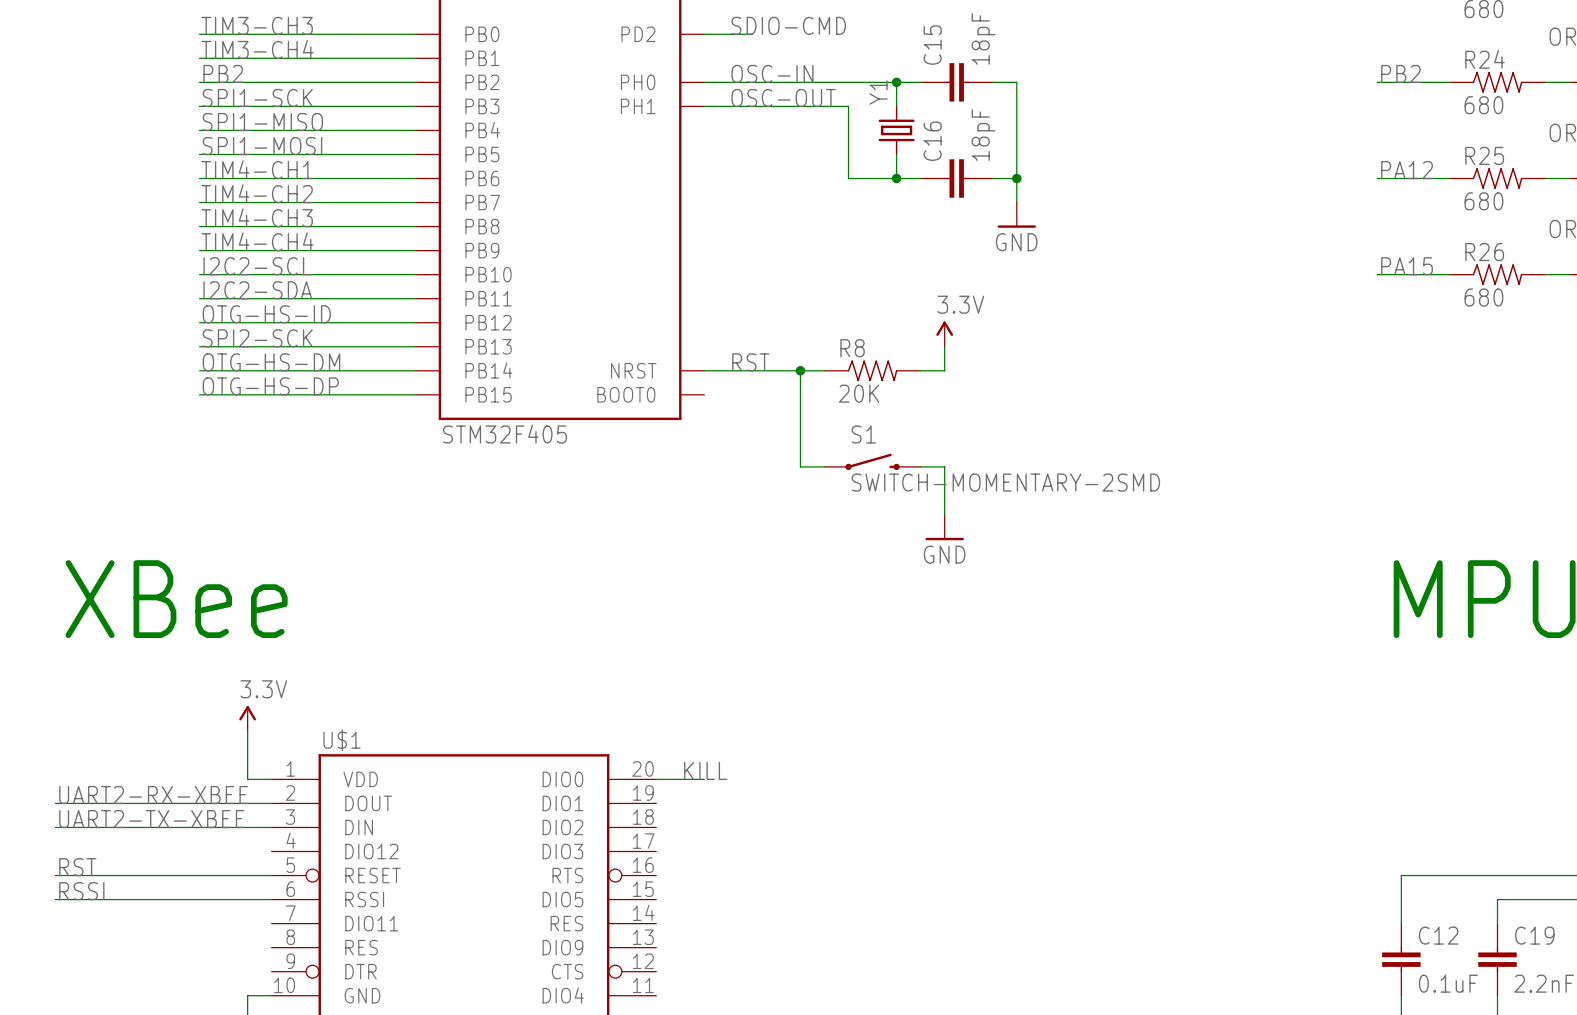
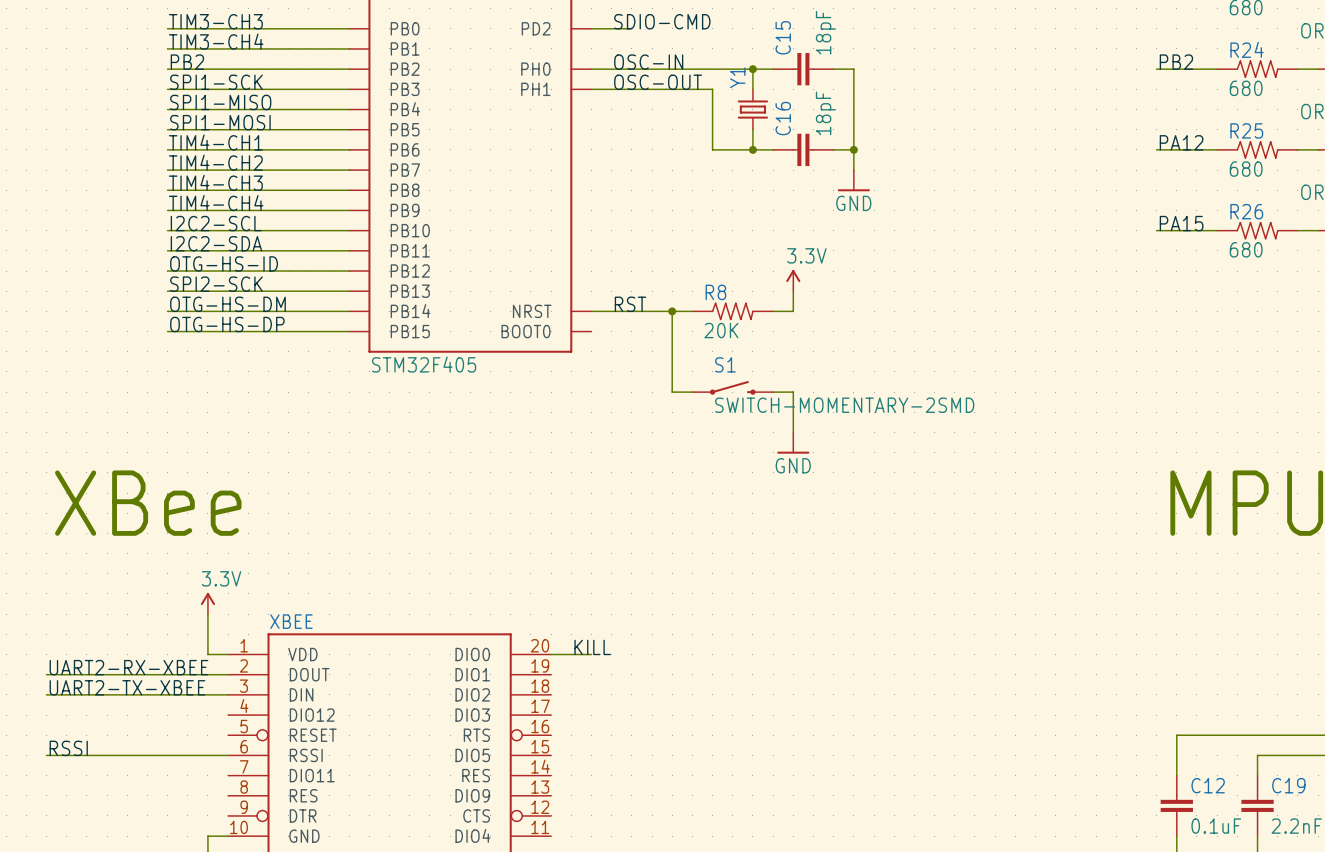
U$1 name: U$1 (342, 740) -> XBEE (291, 621)
label: RST (77, 867) -> none
wire: (55, 875) (271, 875) -> none

